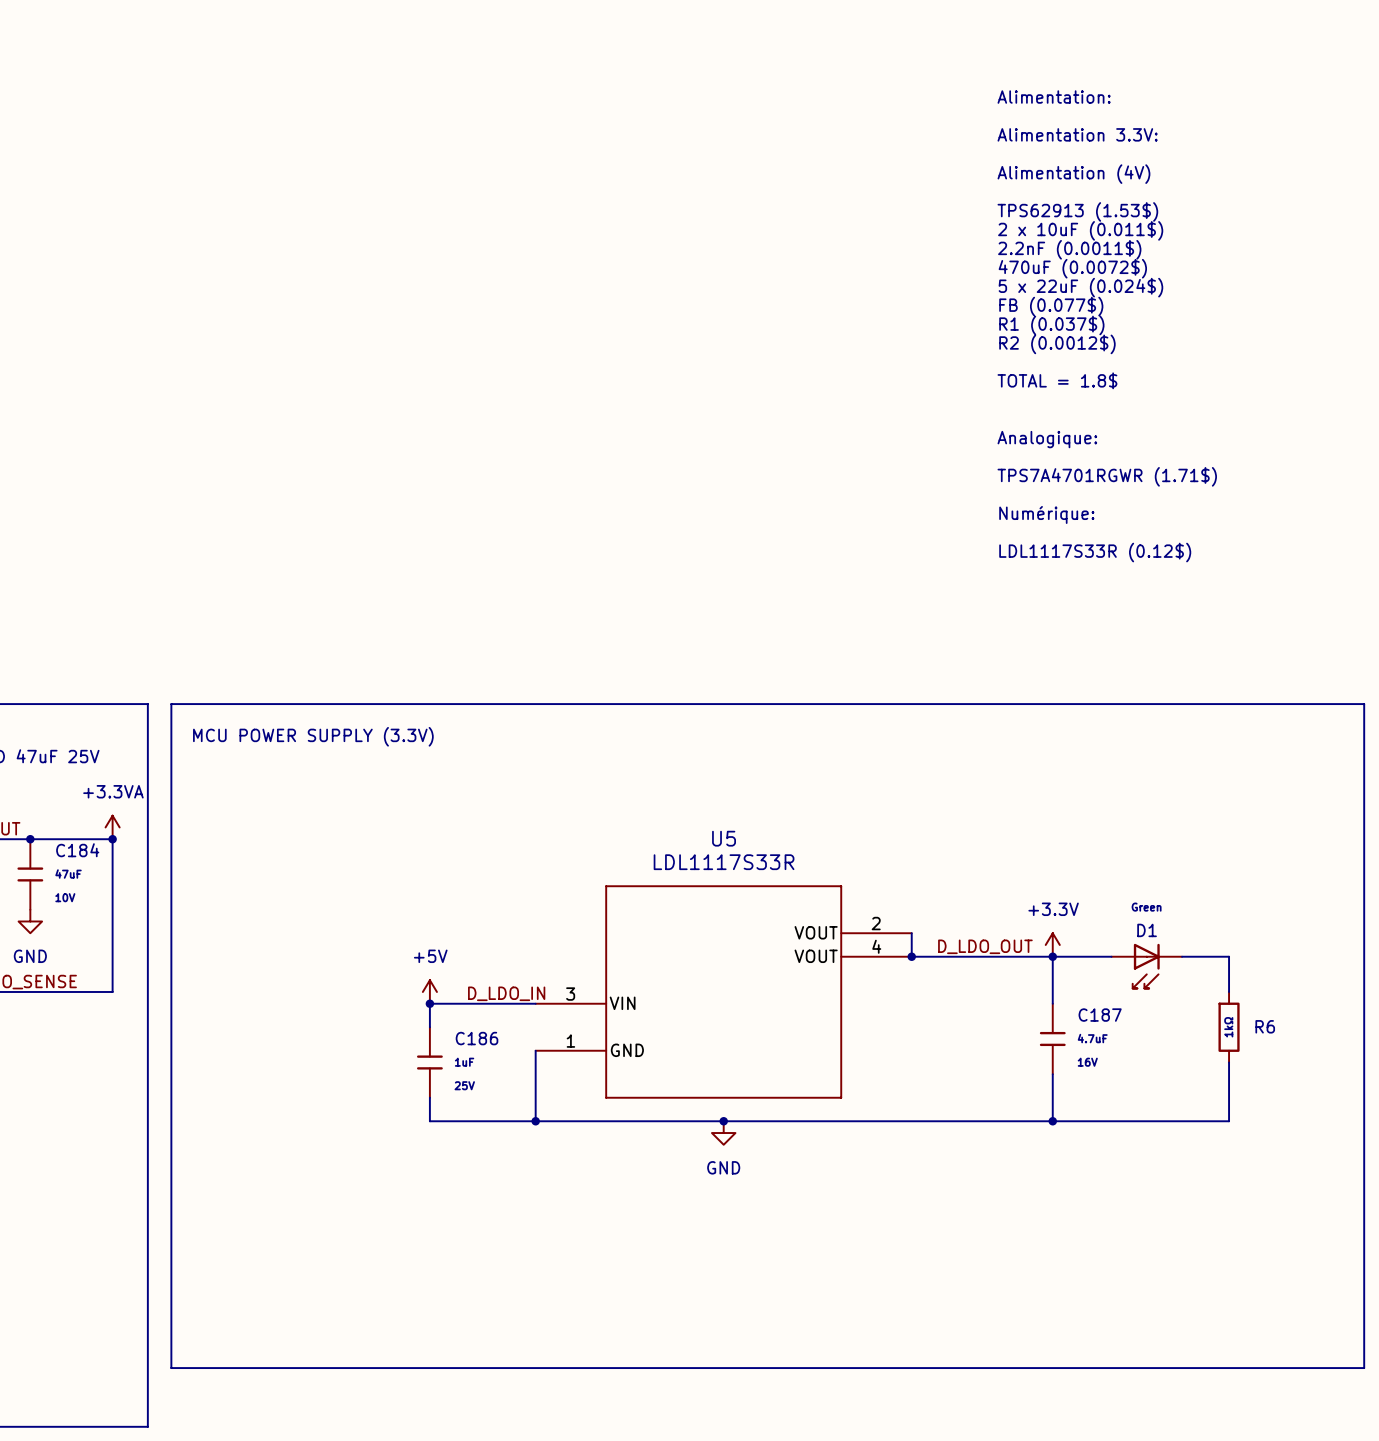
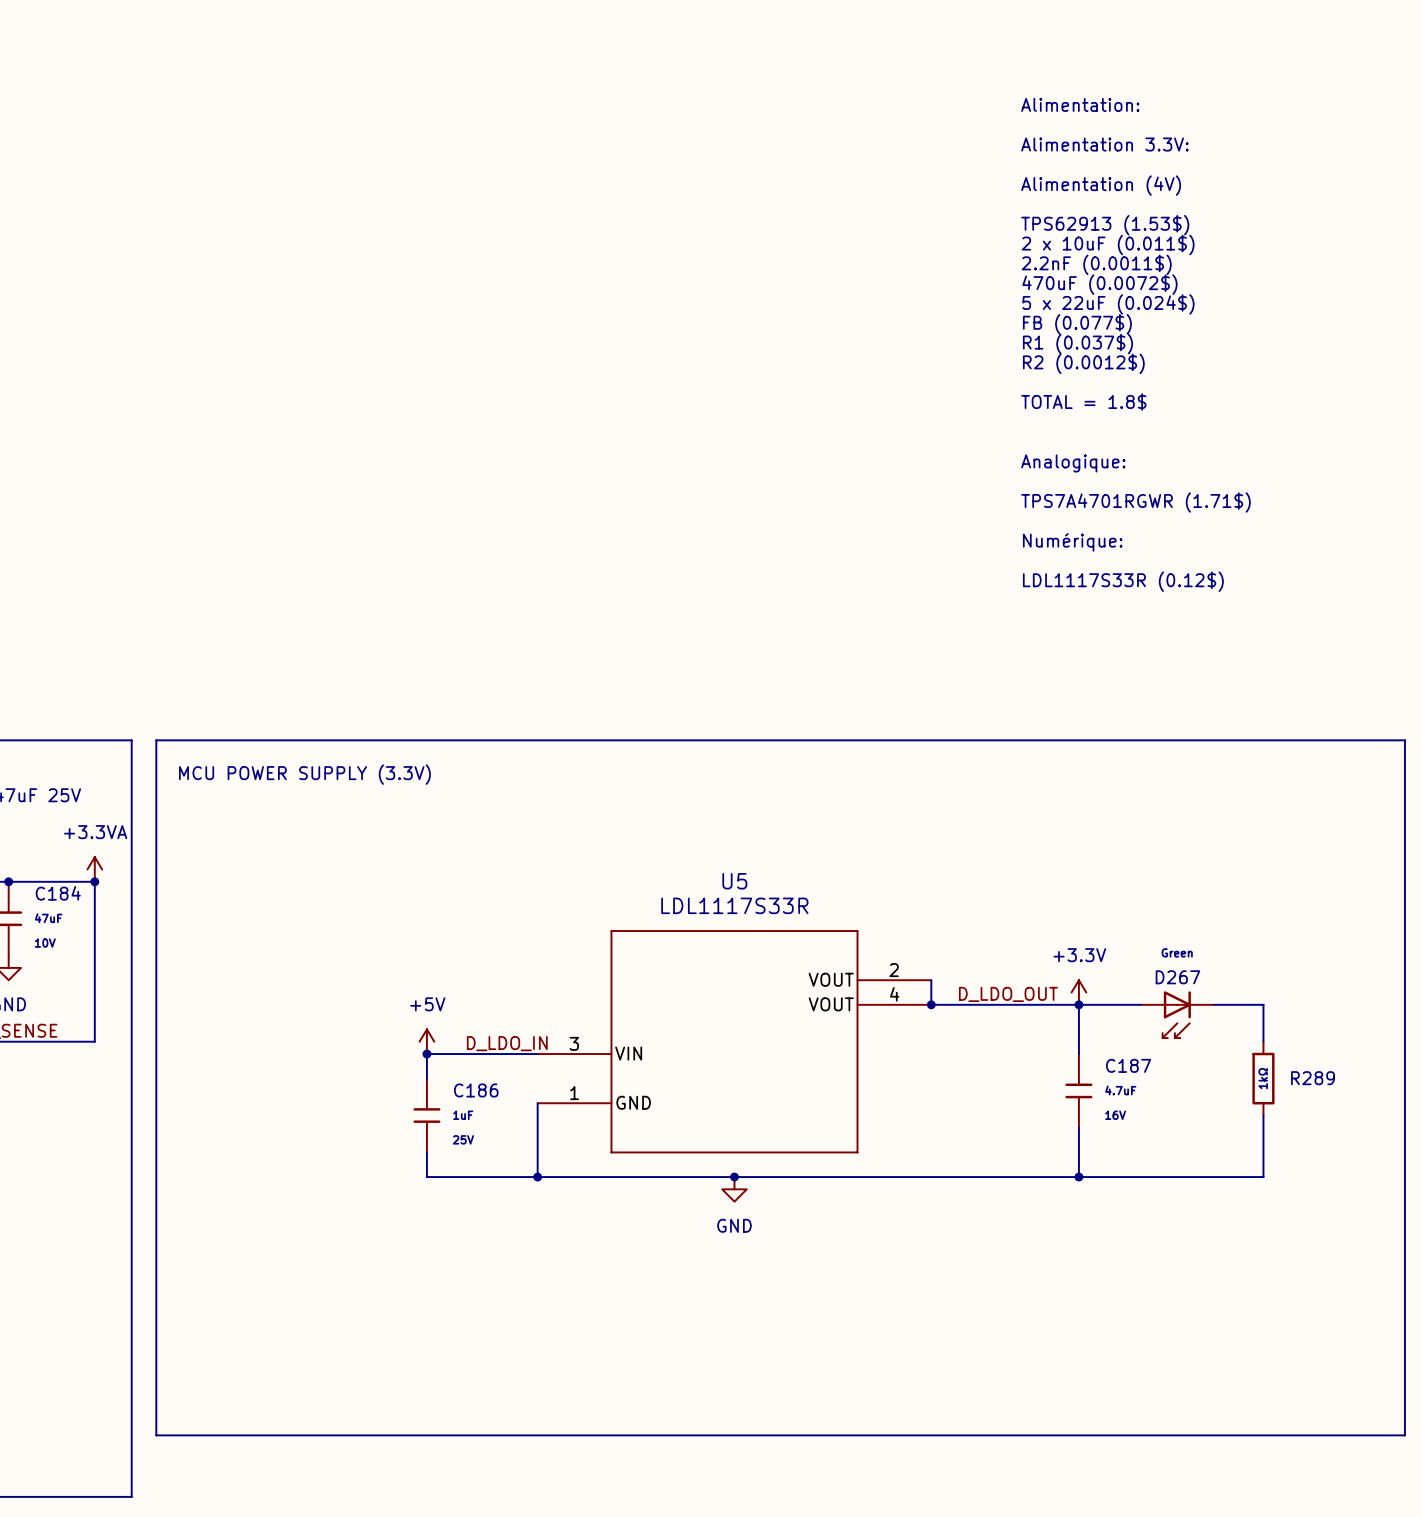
D1 name: D1 (1147, 930) -> D267 (1177, 977)
R6 name: R6 (1265, 1026) -> R289 (1313, 1078)

